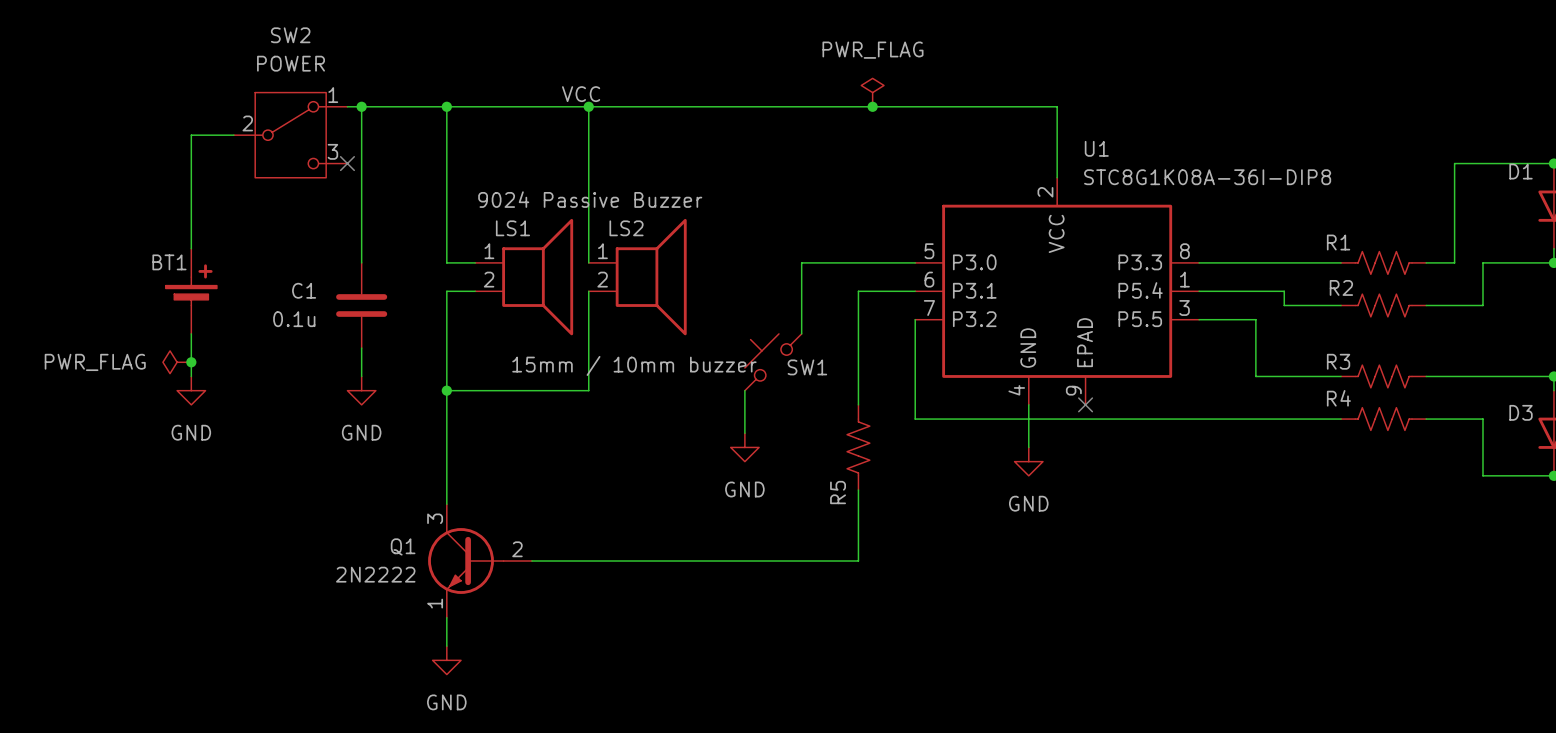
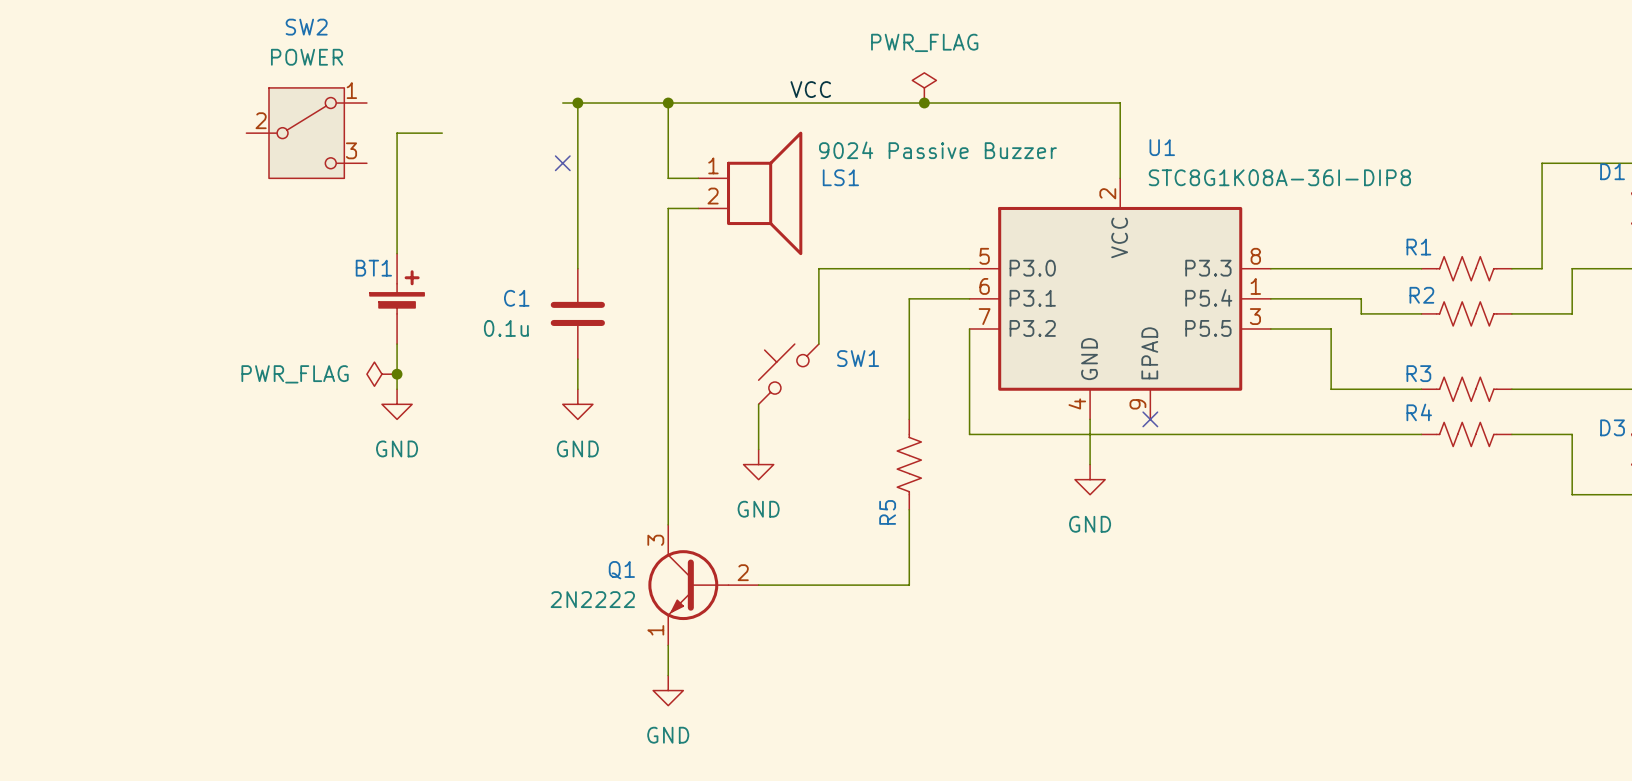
label position: VCC (581, 94) -> VCC (810, 89)
wire: (347, 106) (531, 106) -> none
wire: (361, 106) (361, 262) -> (577, 103) (577, 268)
junction: (361, 106) -> none
wire: (446, 106) (446, 262) (475, 262) -> none
junction: (446, 106) -> none
junction: none -> (577, 103)
wire: (588, 106) (588, 262) -> none
junction: (588, 106) -> none
wire: none -> (668, 103) (668, 178) (698, 178)
junction: none -> (668, 103)
wire: (233, 135) (191, 135) (191, 248) -> (442, 133) (397, 133) (397, 253)
no-connect mark: (347, 163) -> none
no-connect mark: none -> (562, 163)
LS1 value position: 9024 Passive Buzzer (590, 199) -> 9024 Passive Buzzer (937, 150)
wire: none -> (698, 208) (668, 208) (668, 524)
LS1 name position: LS1 (512, 228) -> LS1 (840, 177)
wire: (801, 262) (801, 333) -> (849, 268) (818, 268) (818, 344)
LS1 position: (524, 277) -> (750, 193)
LS2: 15mm / 10mm buzzer (637, 277) -> none
BT1 position: (191, 291) -> (397, 298)
wire: (475, 291) (446, 291) (446, 504) -> none
wire: (588, 291) (588, 390) (446, 390) -> none
C1 position: (361, 305) -> (577, 313)
wire: (191, 333) (191, 376) -> (397, 344) (397, 389)
wire: (361, 348) (361, 376) -> (577, 359) (577, 389)
power symbol position: PWR_FLAG (177, 362) -> PWR_FLAG (381, 374)
junction: (191, 362) -> none
junction: none -> (397, 374)
SW1 position: (773, 362) -> (788, 374)
SW1 name position: SW1 (807, 367) -> SW1 (858, 358)
power symbol: GND (191, 390) -> none
power symbol position: GND (361, 390) -> GND (397, 404)
junction: (446, 390) -> none
power symbol: none -> GND (577, 404)
wire: (744, 390) (744, 433) -> (758, 404) (758, 449)
power symbol position: GND (744, 447) -> GND (758, 464)
Q1 position: (480, 561) -> (703, 585)
wire: (531, 561) (716, 561) -> none
wire: (446, 617) (446, 646) -> (668, 645) (668, 675)
power symbol: GND (446, 660) -> none
power symbol: none -> GND (668, 690)

